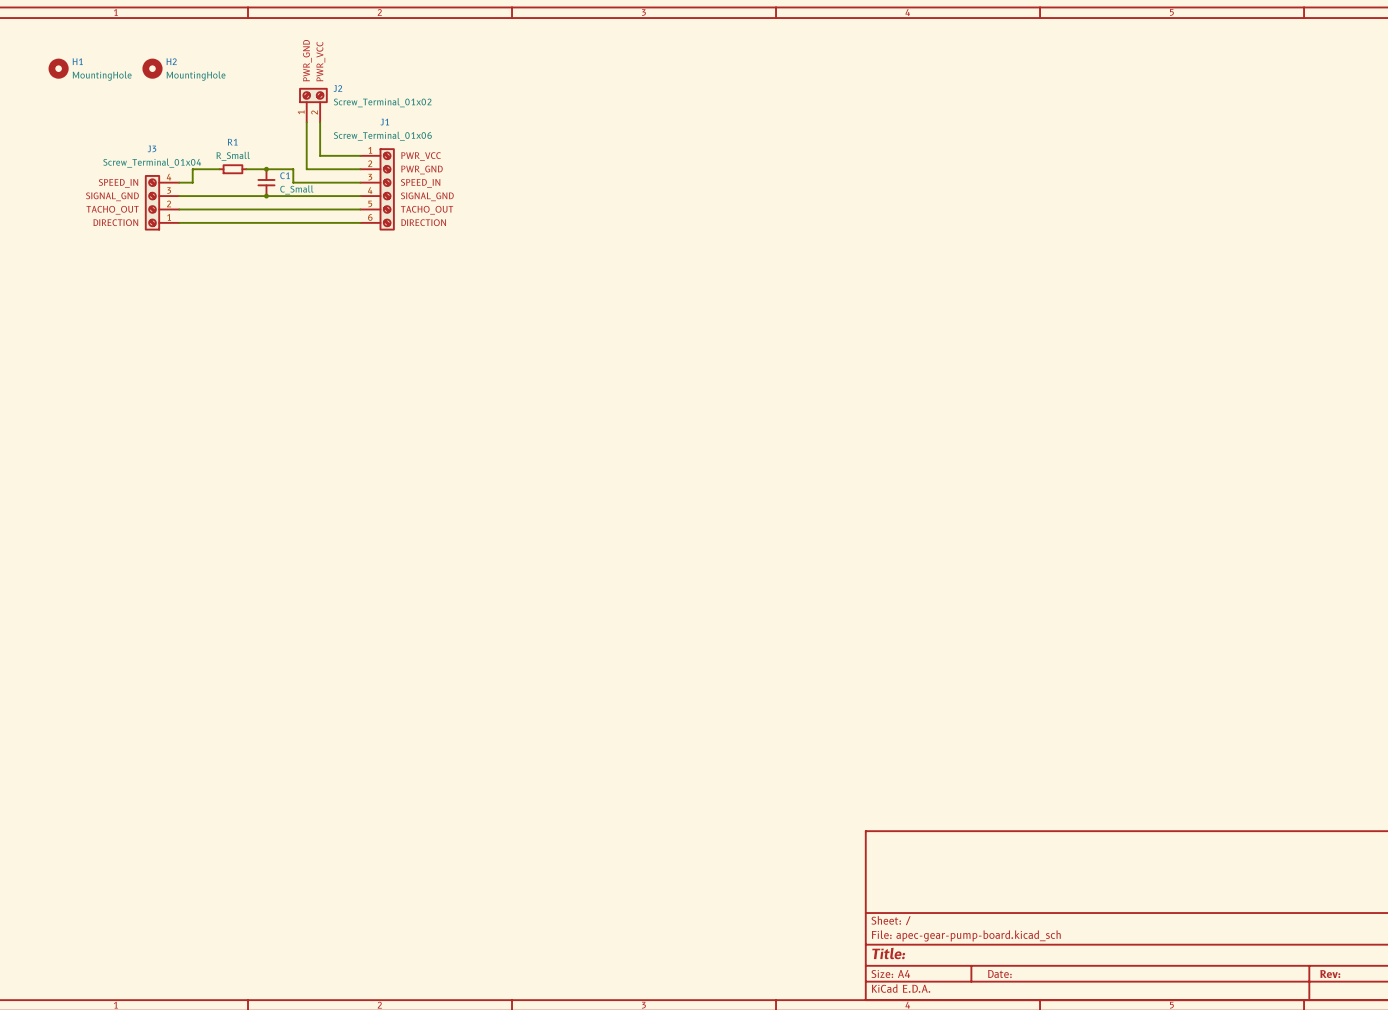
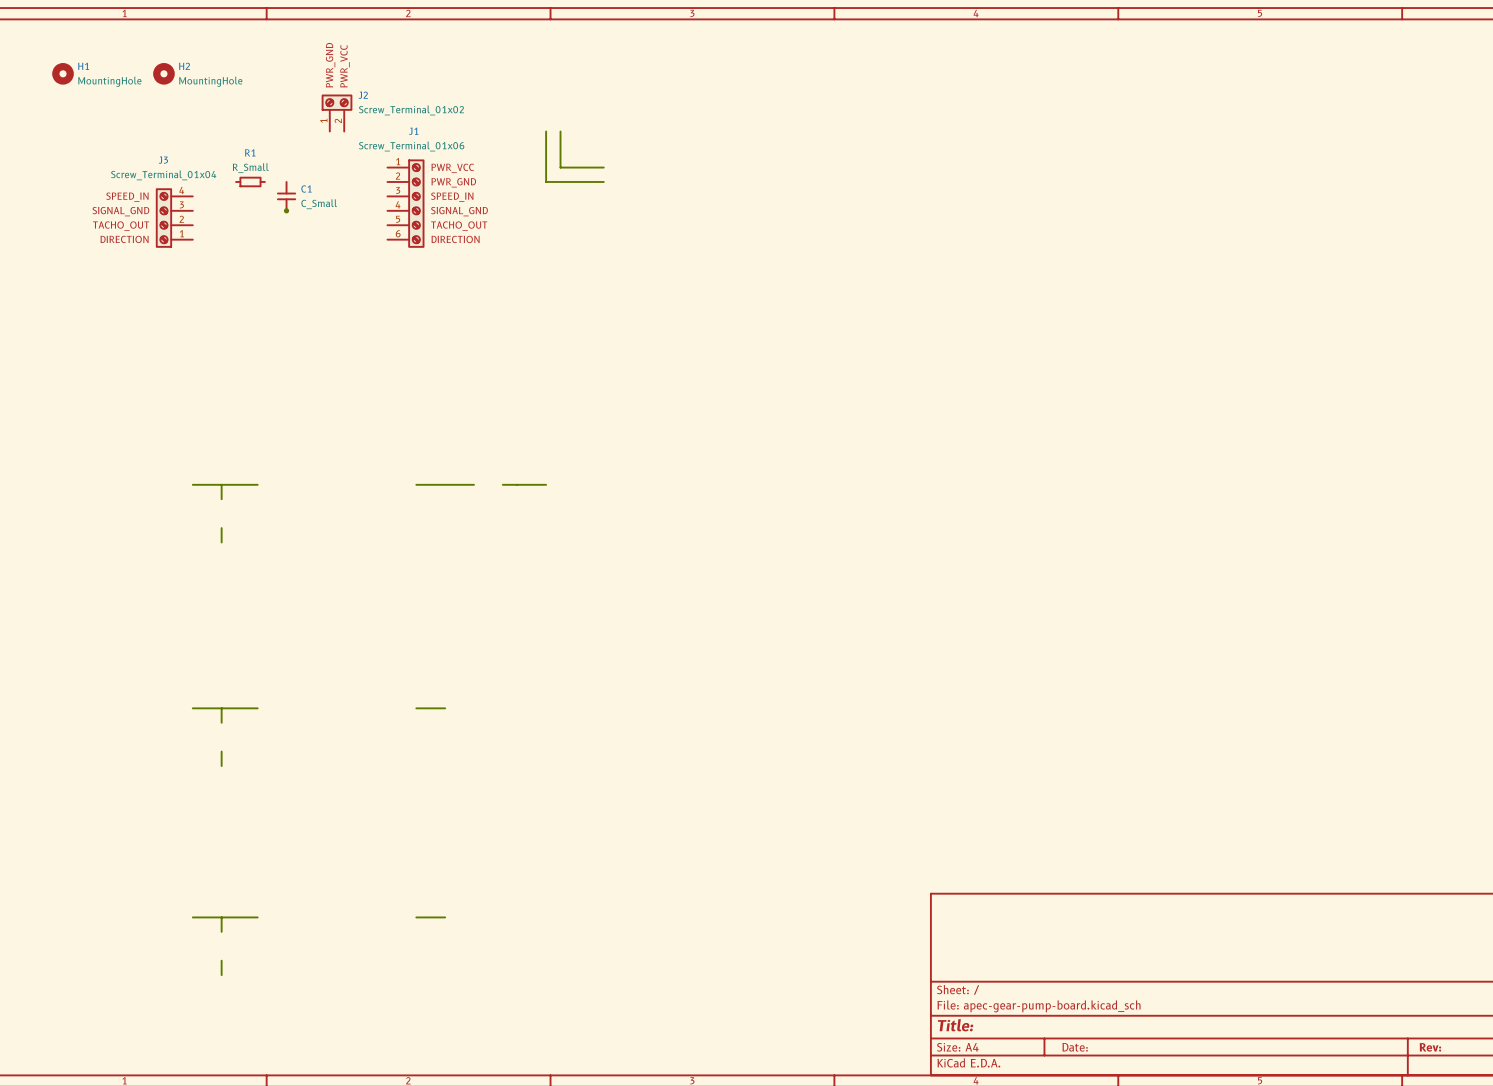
wire: (306, 122) (306, 169) (360, 169) -> none
wire: (320, 122) (320, 155) (360, 155) -> none
wire: none -> (546, 131) (546, 181) (603, 181)
wire: none -> (560, 131) (560, 167) (603, 167)
wire: (219, 169) (192, 169) (192, 182) (179, 182) -> none
wire: (246, 169) (293, 169) (293, 182) (360, 182) -> none
junction: (266, 169) -> none
wire: (179, 196) (360, 196) -> none
wire: (179, 209) (360, 209) -> none
wire: (179, 222) (360, 222) -> none
wire: none -> (192, 484) (257, 484)
wire: none -> (221, 484) (221, 499)
wire: none -> (416, 484) (474, 484)
wire: none -> (502, 484) (546, 484)
wire: none -> (221, 528) (221, 542)
wire: none -> (192, 708) (257, 708)
wire: none -> (221, 708) (221, 722)
wire: none -> (416, 708) (445, 708)
wire: none -> (221, 751) (221, 766)
wire: none -> (192, 917) (257, 917)
wire: none -> (221, 917) (221, 931)
wire: none -> (416, 917) (445, 917)
wire: none -> (221, 960) (221, 975)

